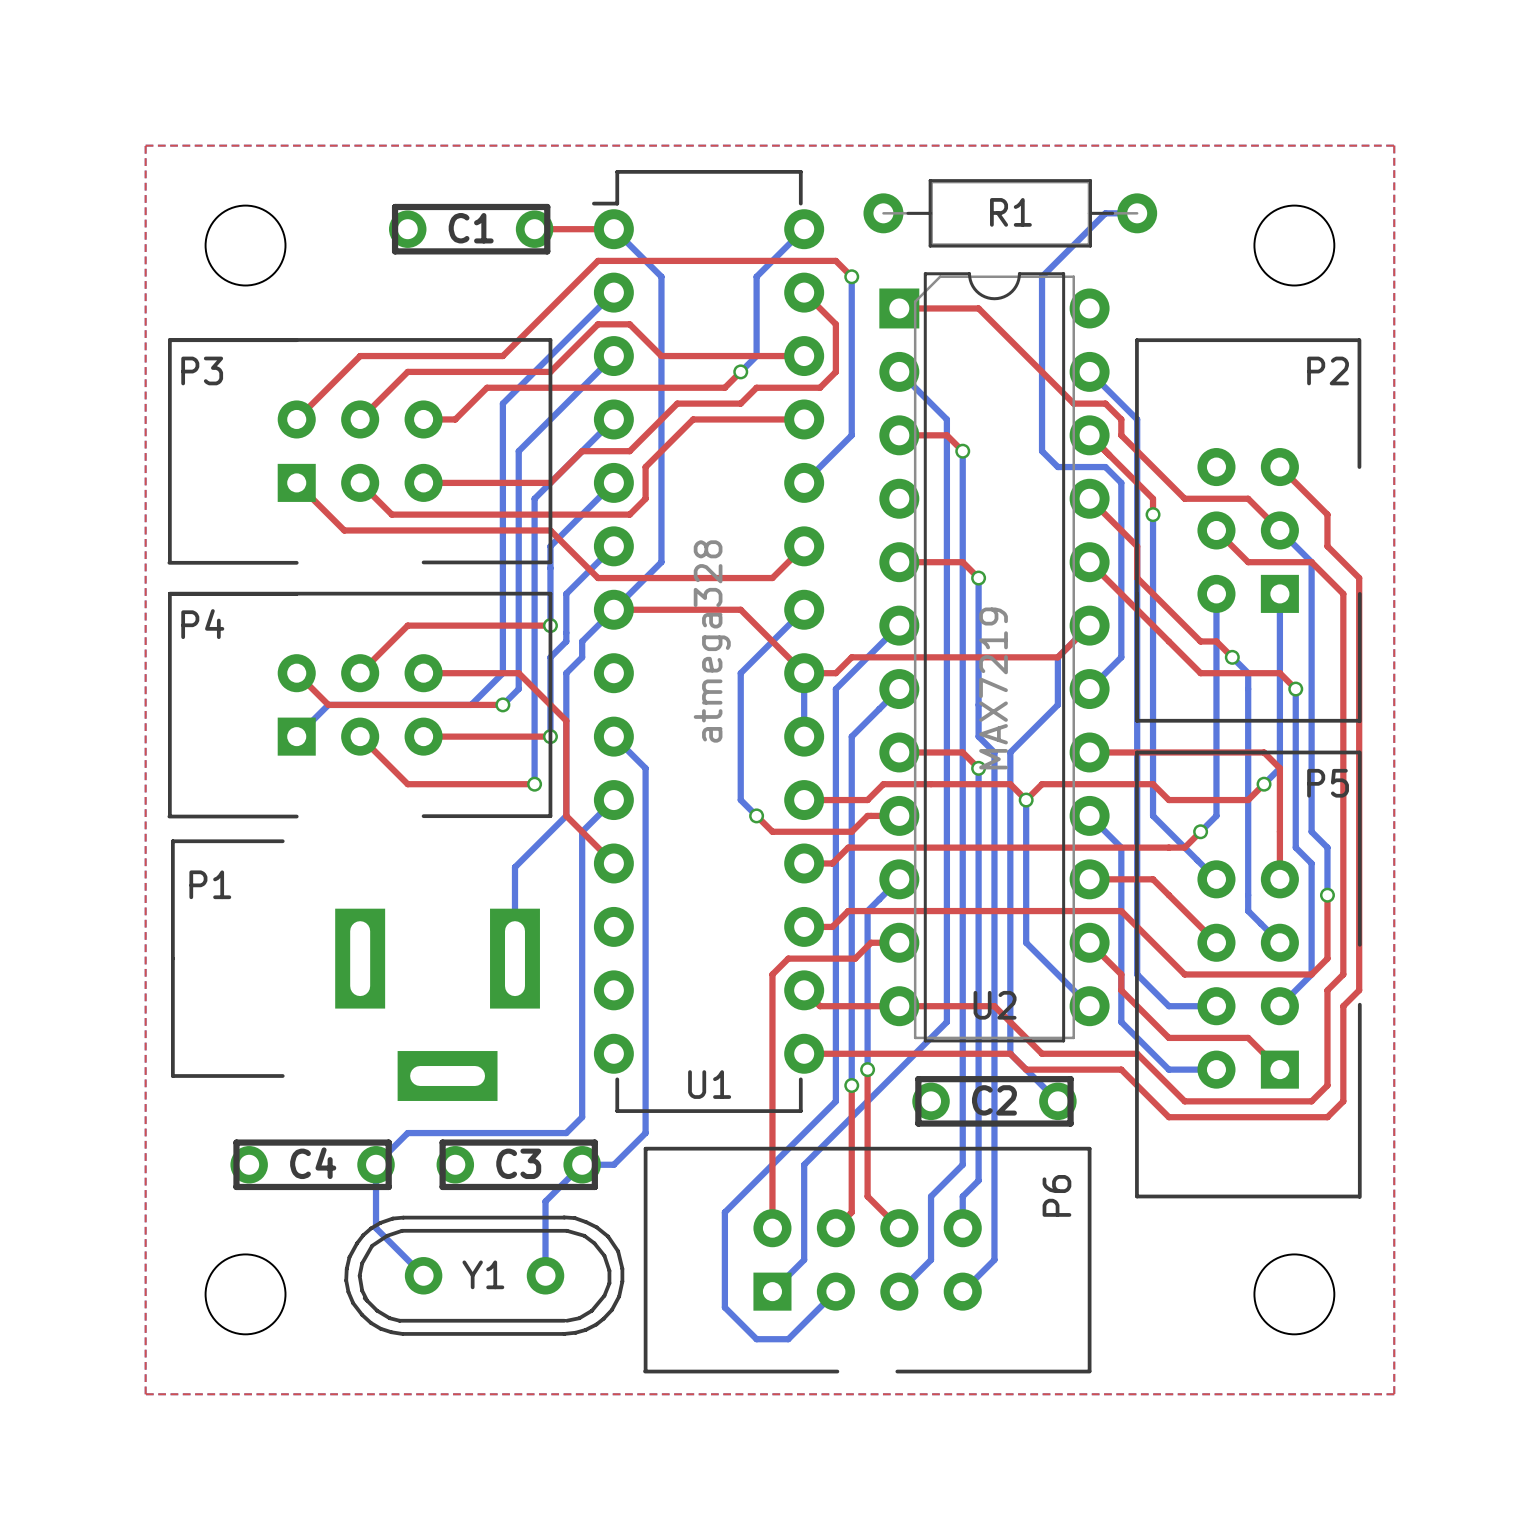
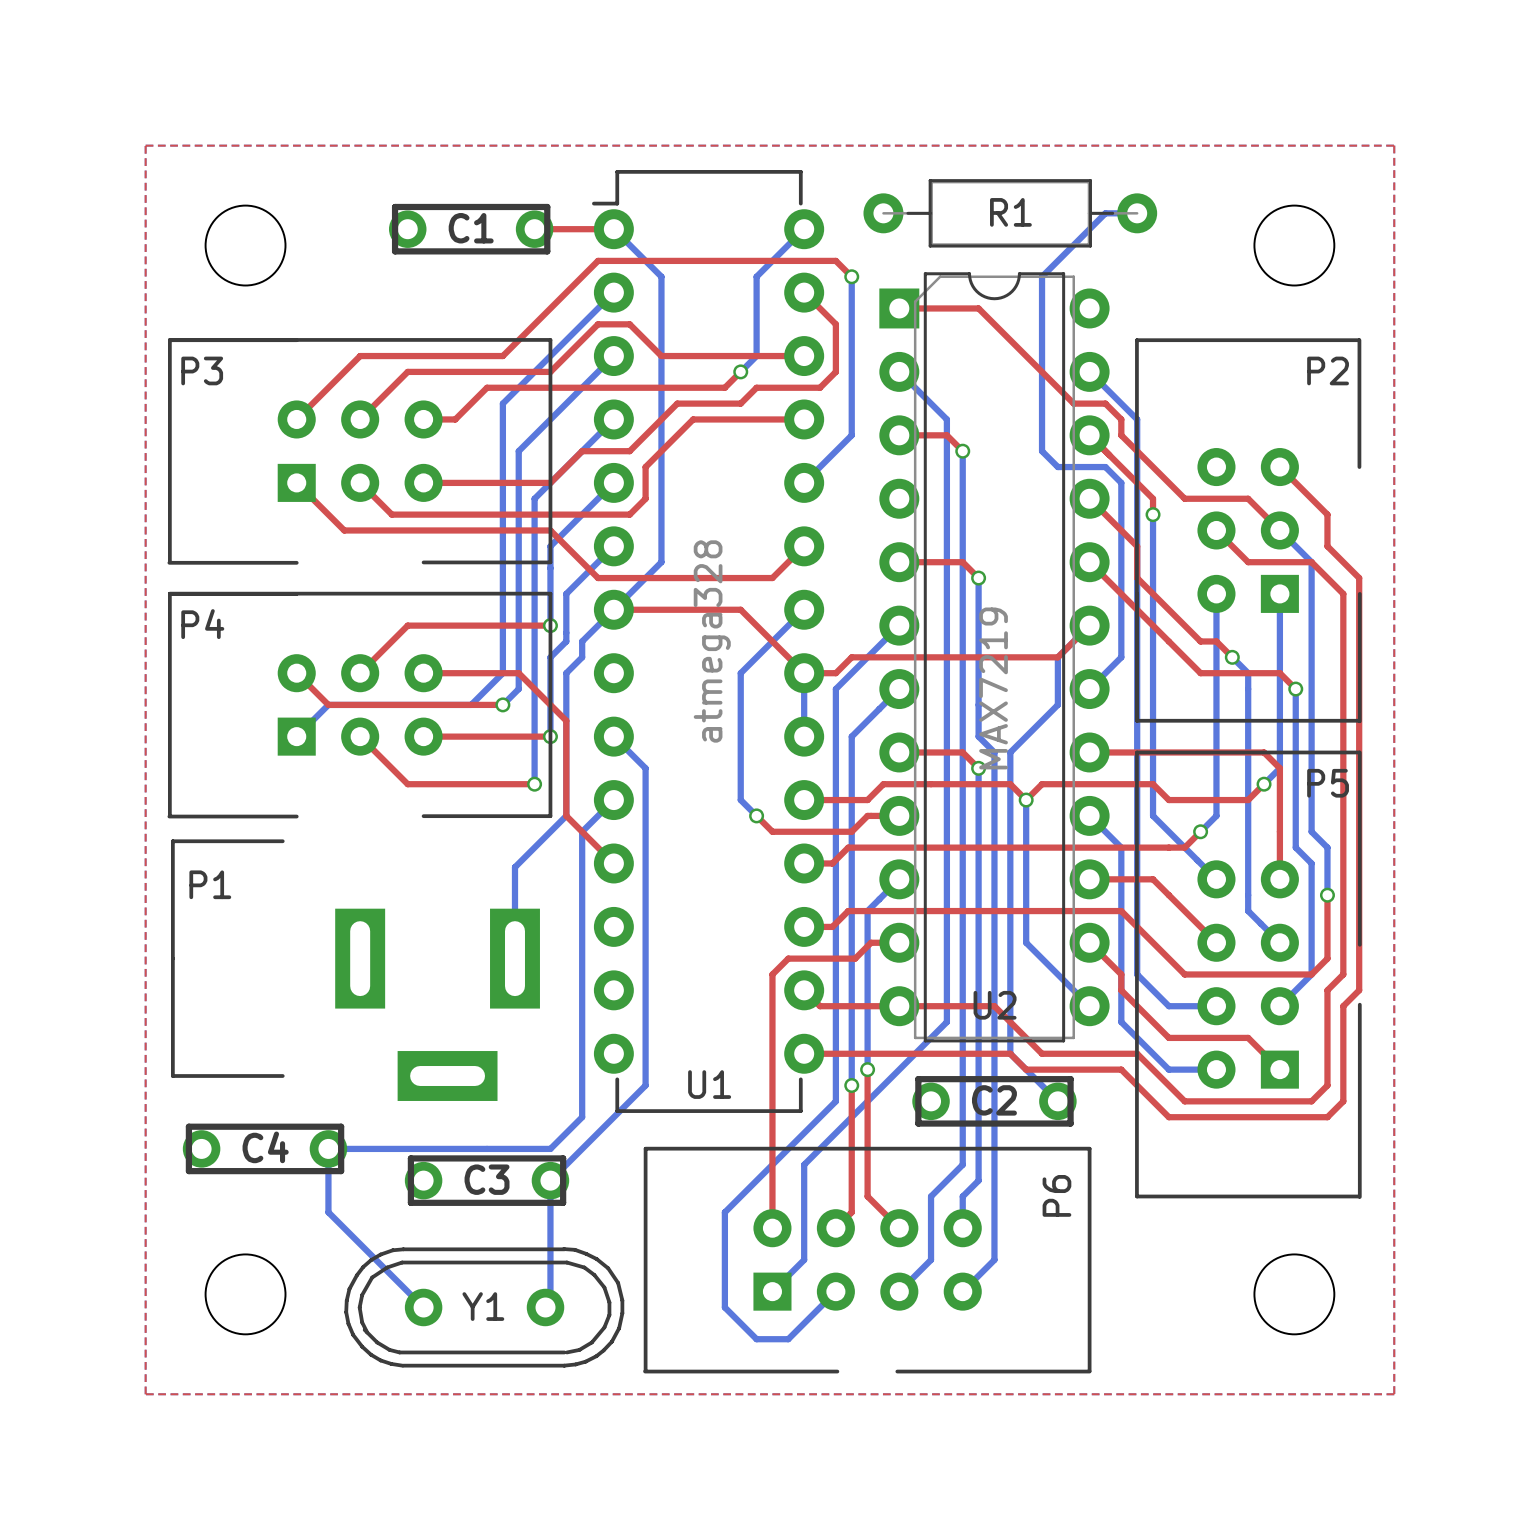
bottom track: (645, 1085) (645, 1133) (613, 1164) (582, 1164) (545, 1201) (545, 1275) -> (645, 1085) (550, 1180) (550, 1302) (545, 1307)
bottom track: (566, 1133) (407, 1133) (376, 1164) (376, 1228) (423, 1275) -> (566, 1133) (550, 1148) (328, 1148) (328, 1212) (423, 1307)
C4 position: (312, 1164) -> (265, 1148)
C3 position: (518, 1164) -> (487, 1180)
Y1 position: (484, 1275) -> (484, 1307)

